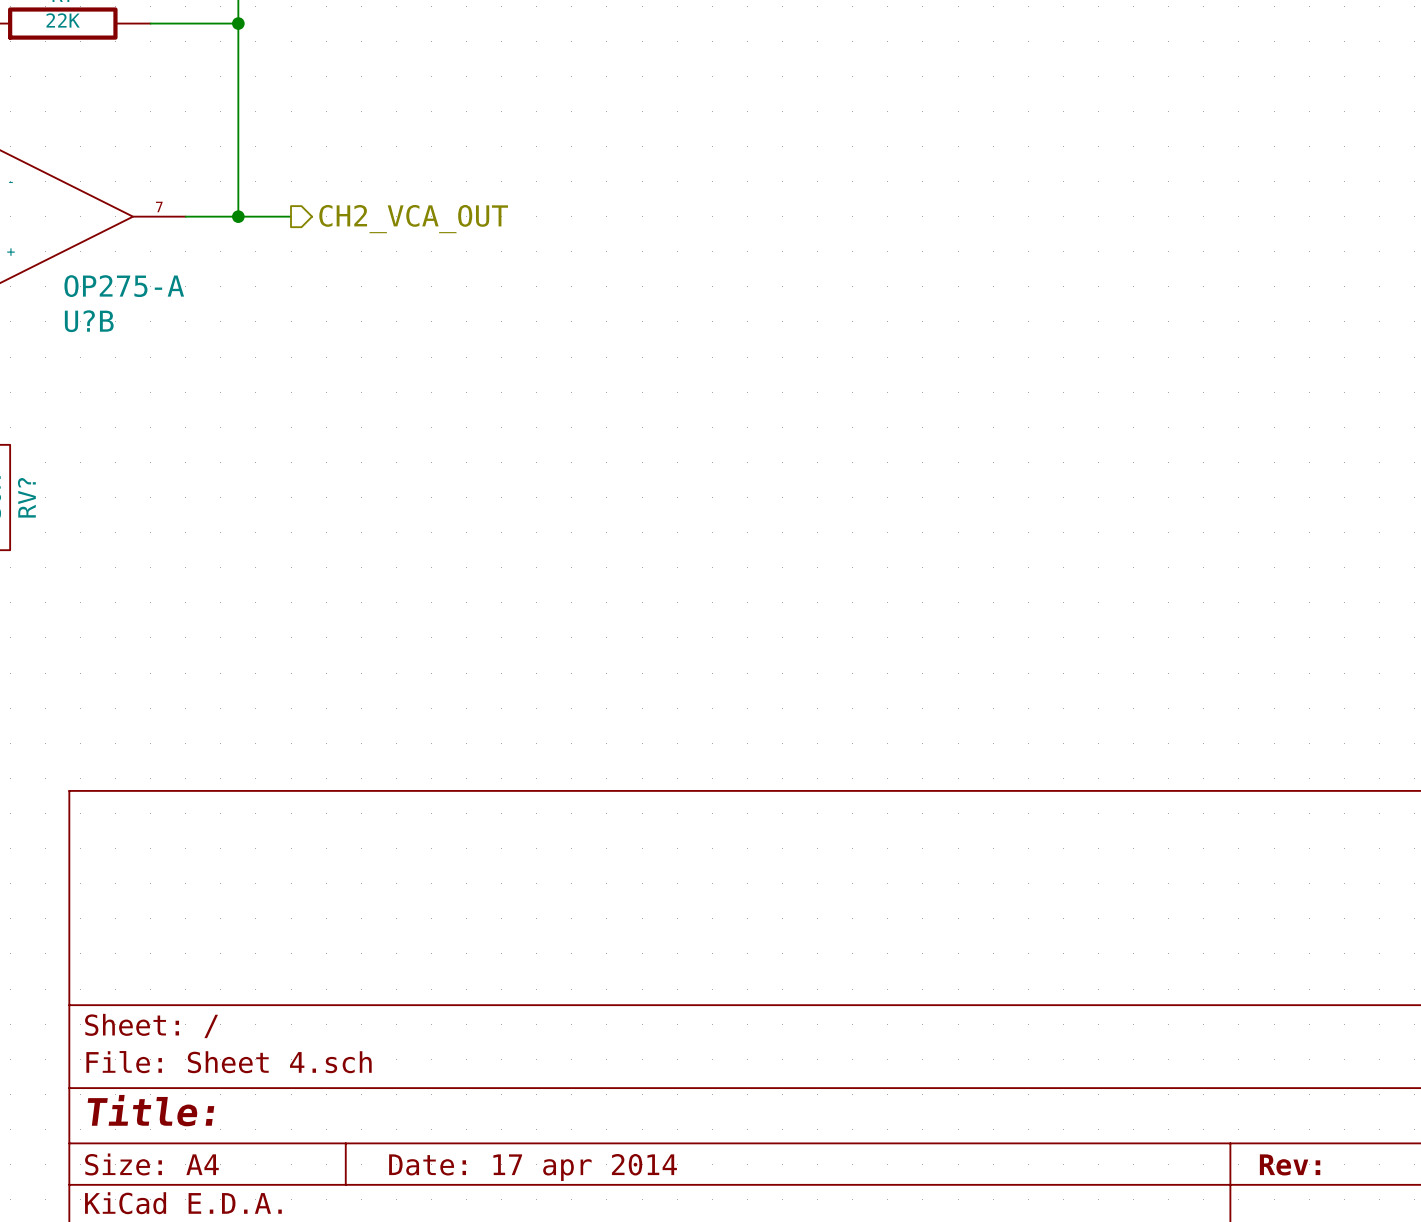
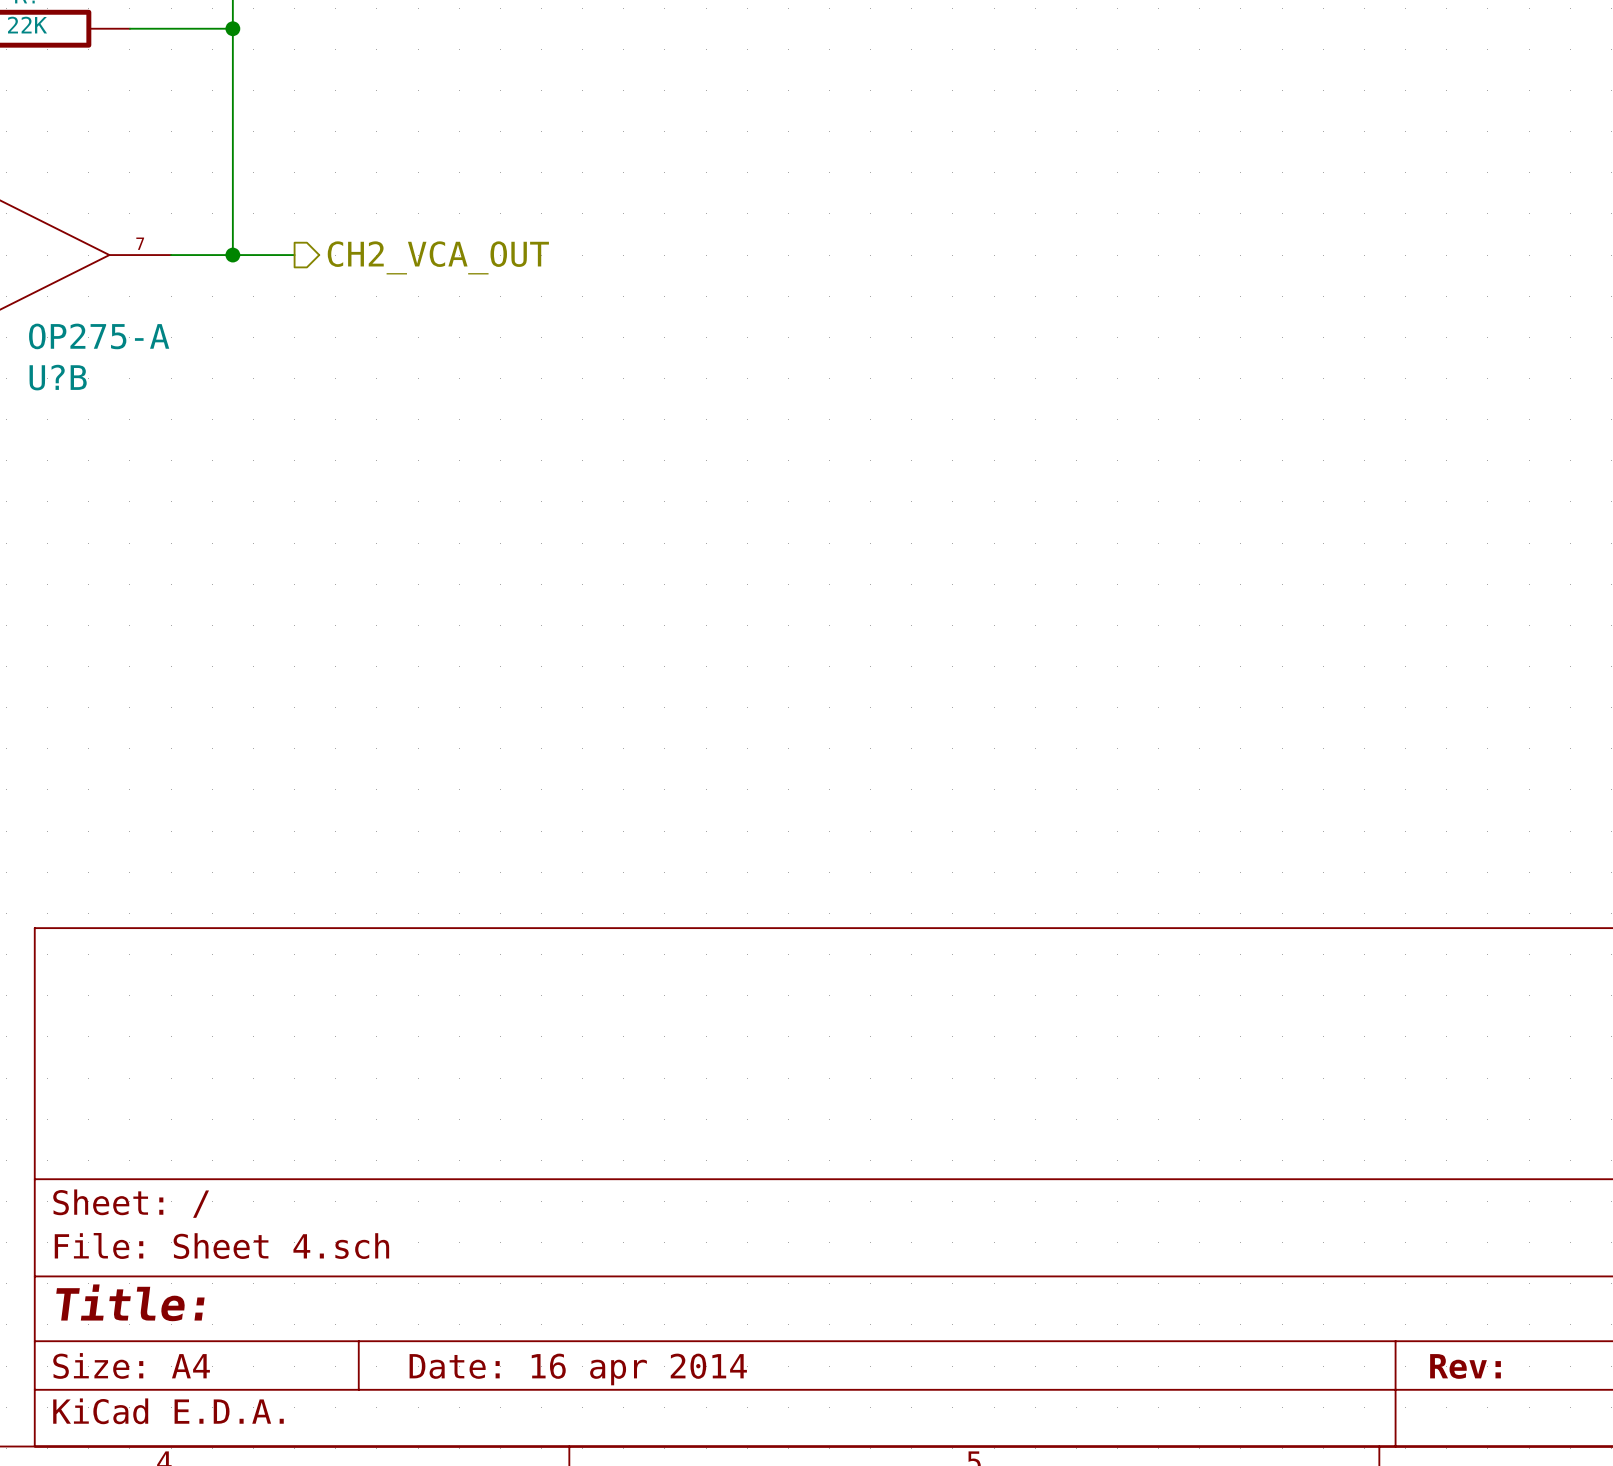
title block: Date: 17 apr 2014 (533, 1167) -> Date: 16 apr 2014 (578, 1369)

